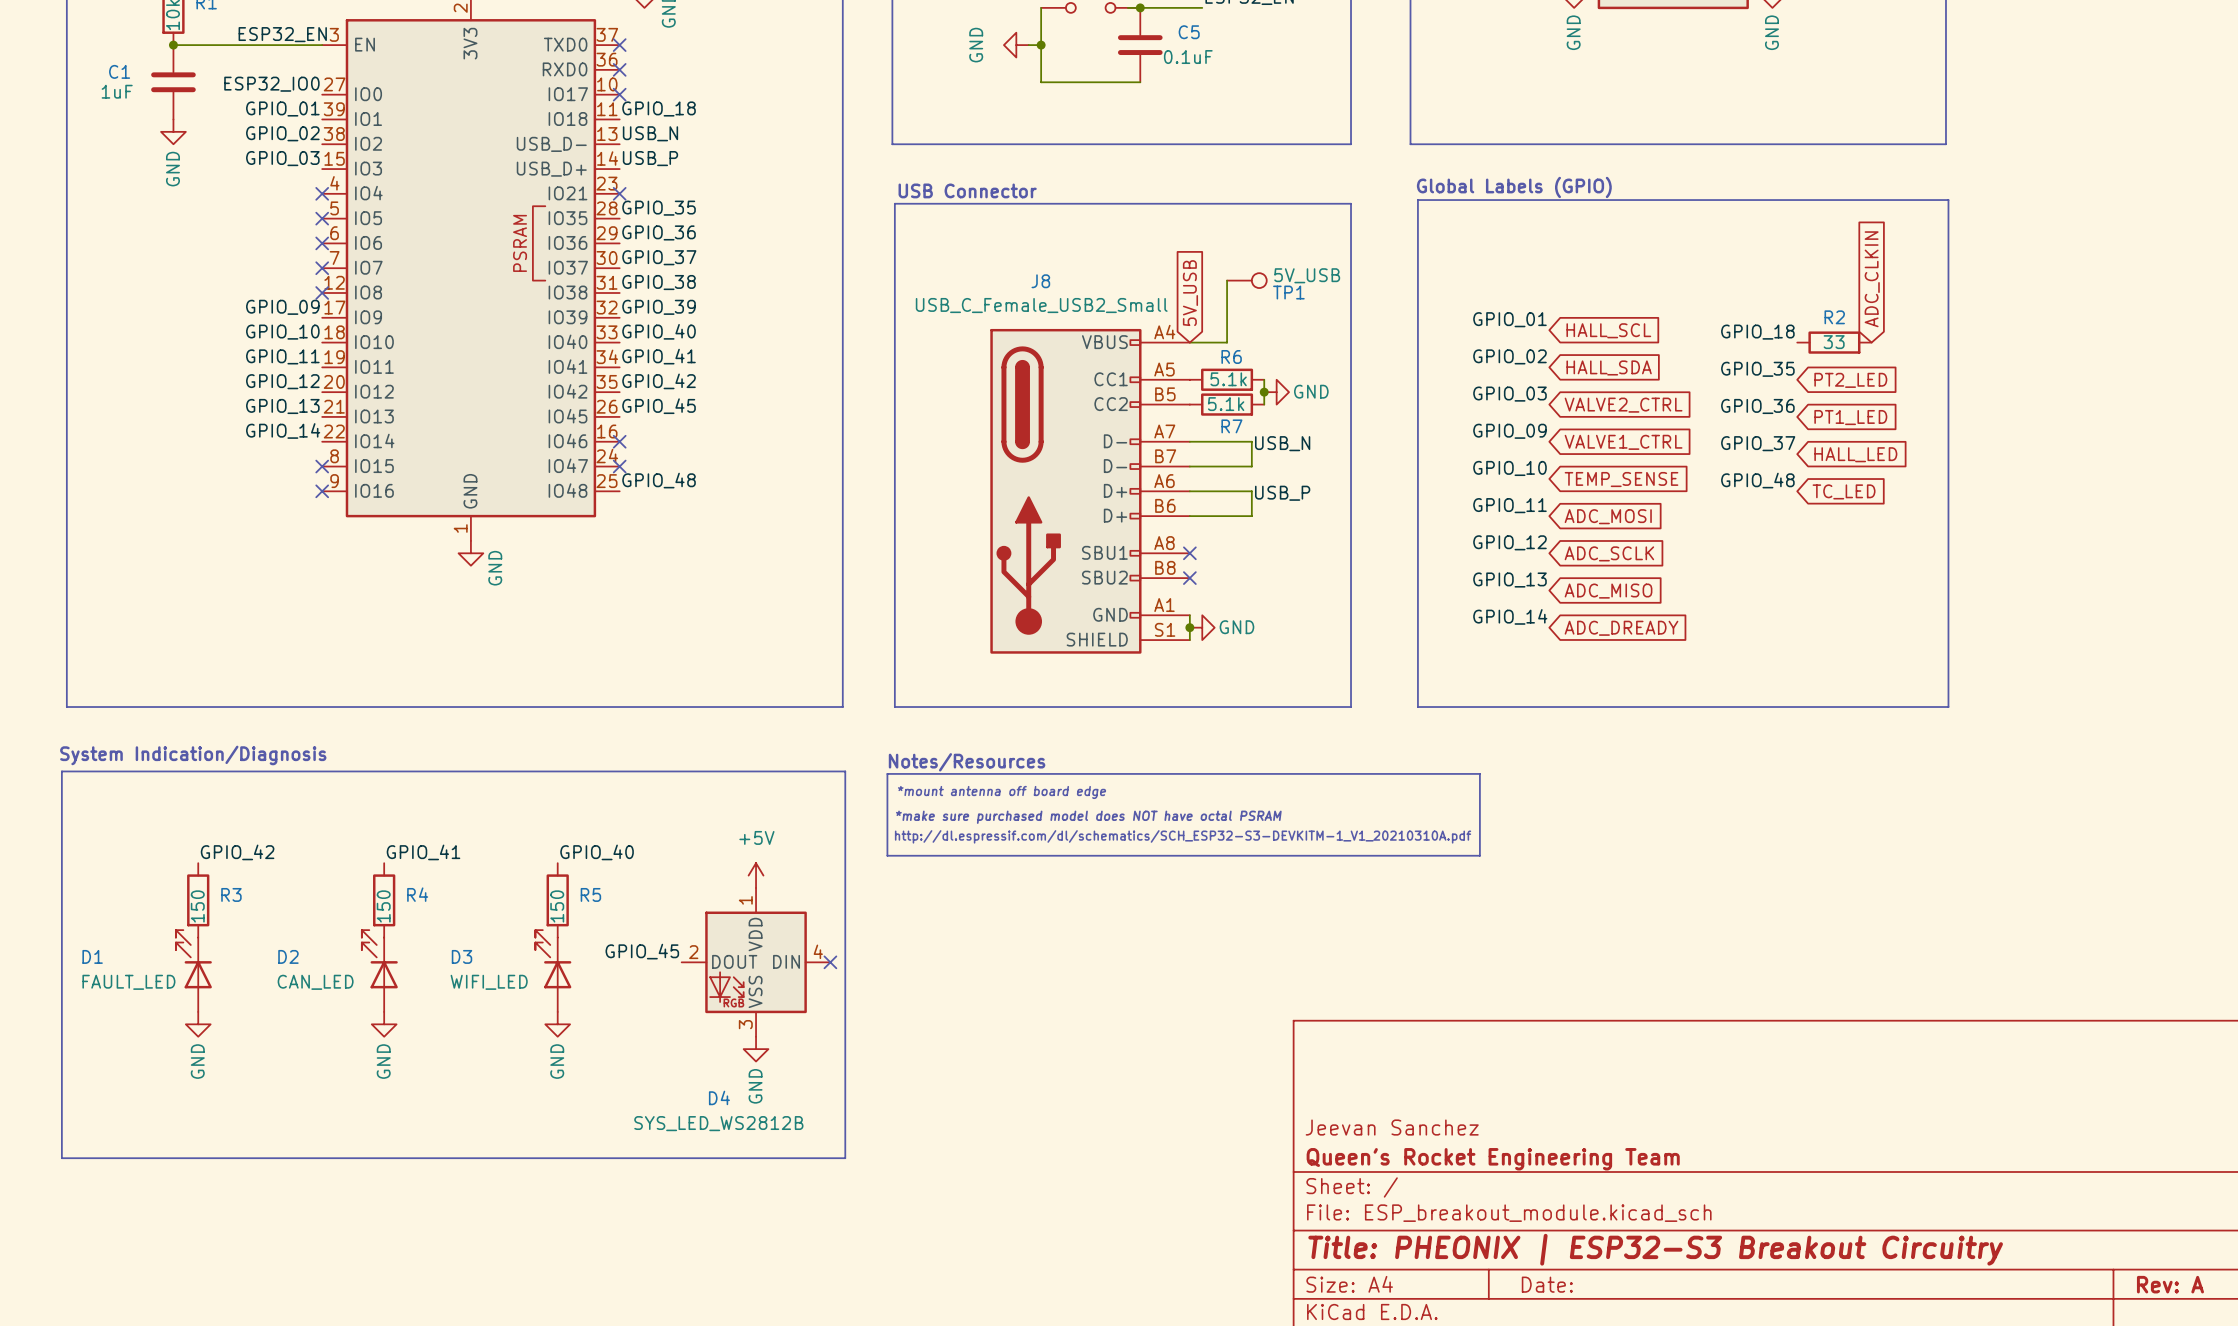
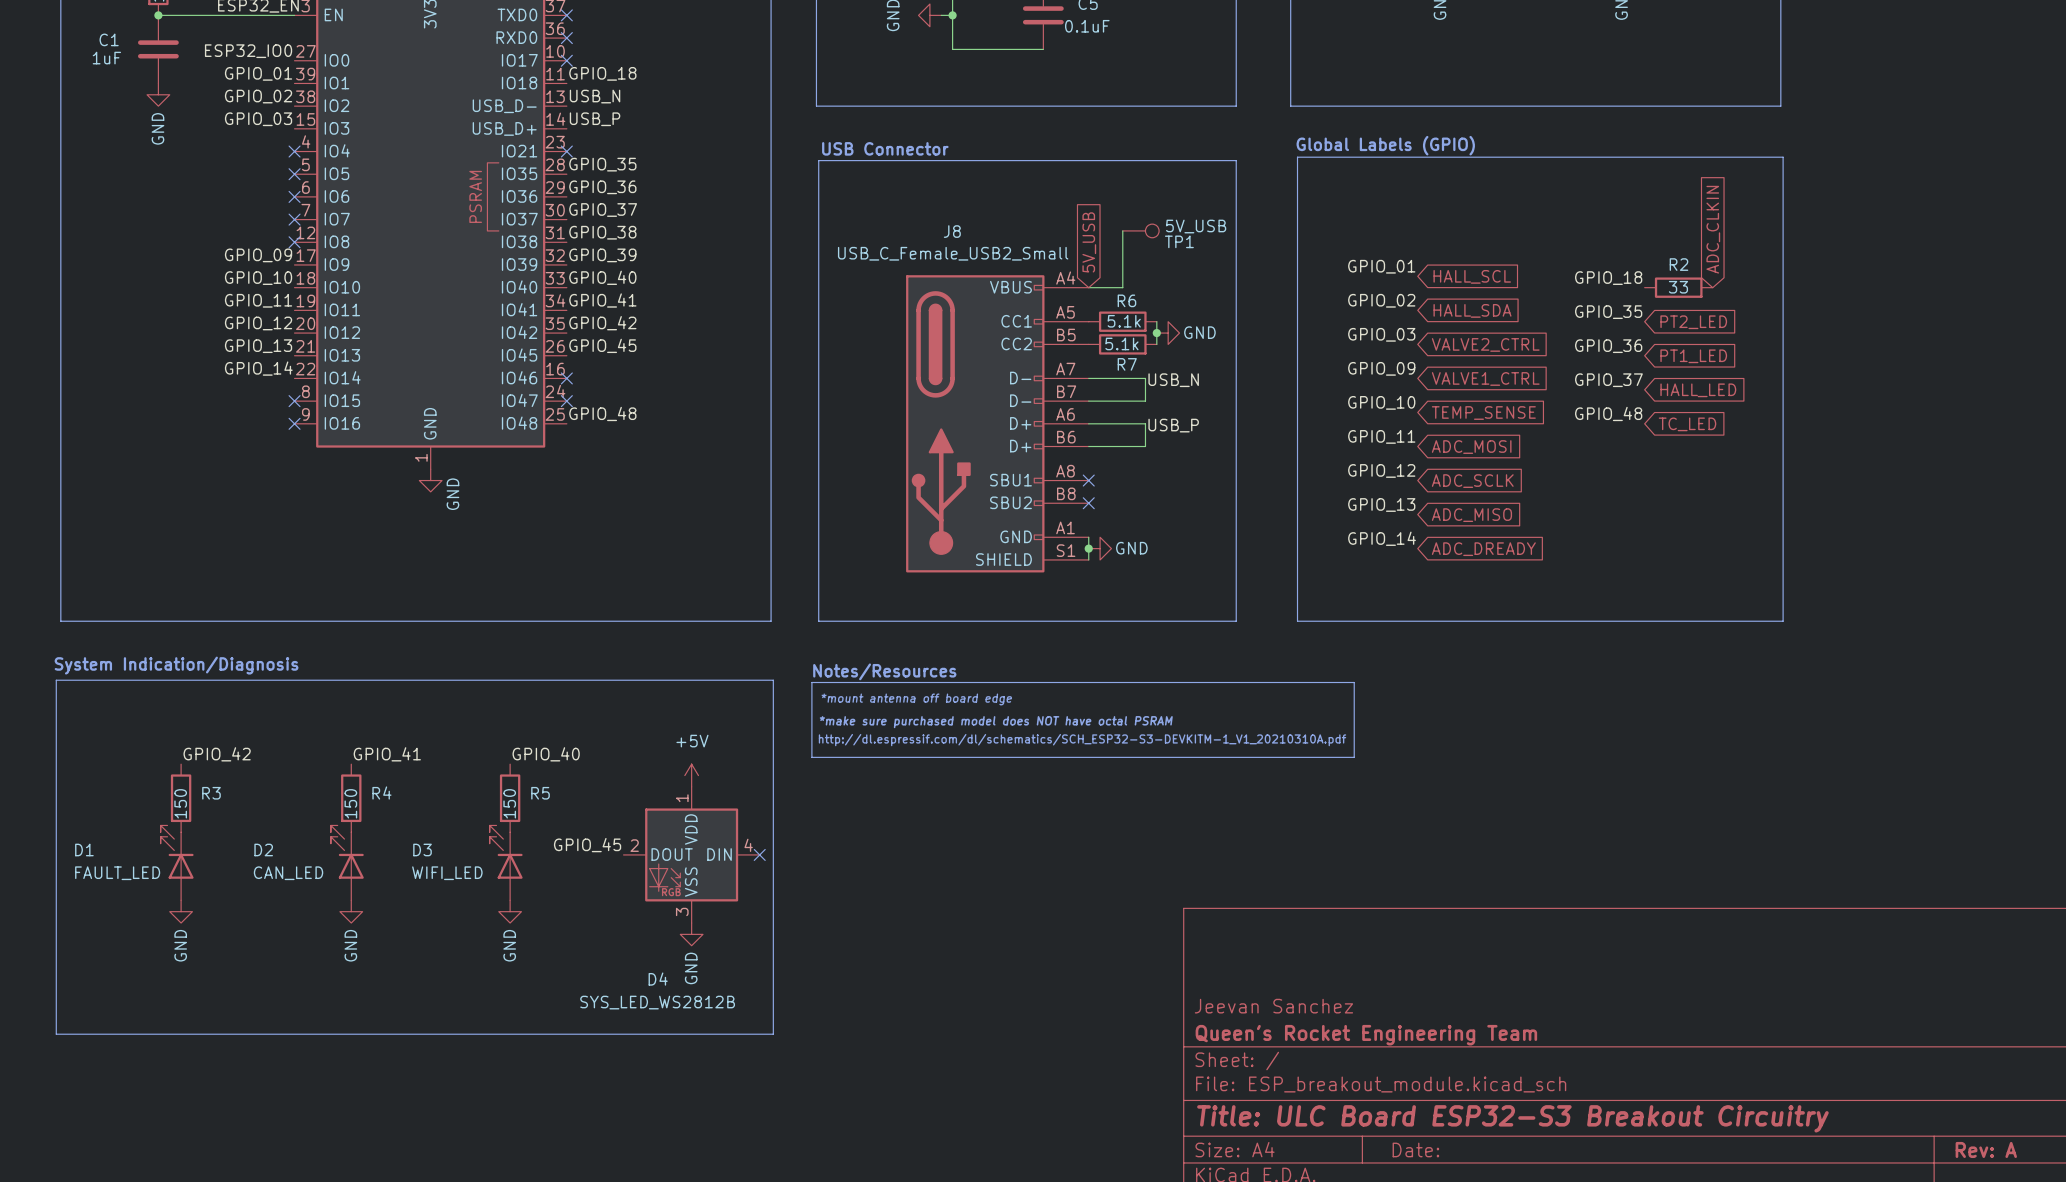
title block: Title: PHEONIX | ESP32-S3 Breakout Circuitry (1655, 1249) -> Title: ULC Board ESP32-S3 Breakout Circuitry (1512, 1118)

